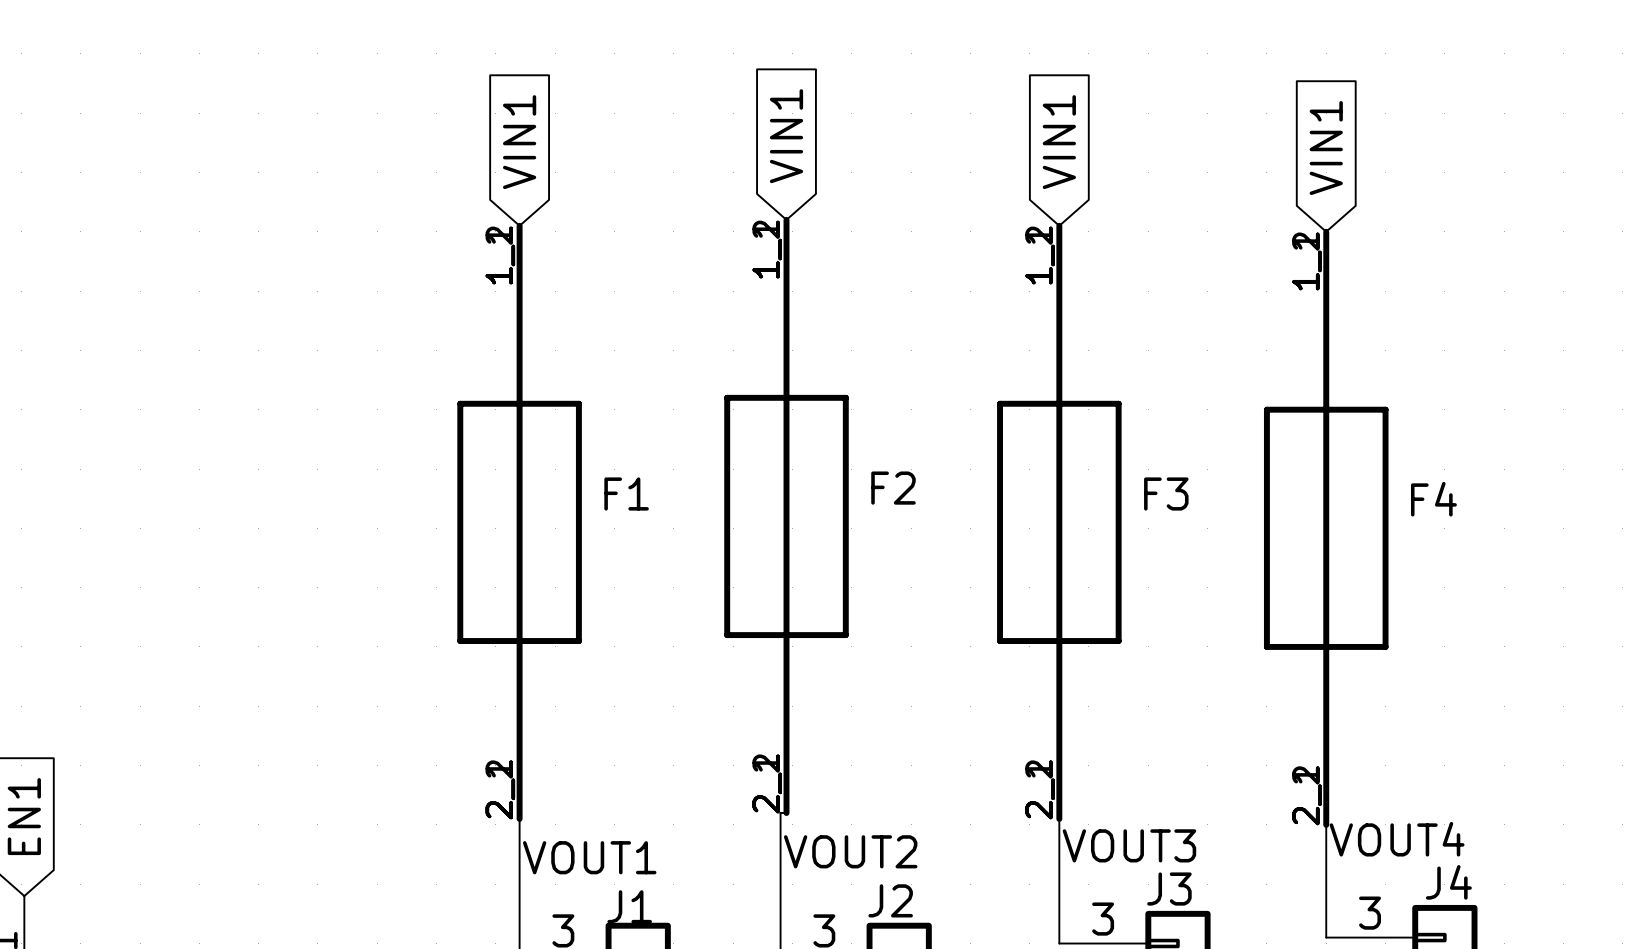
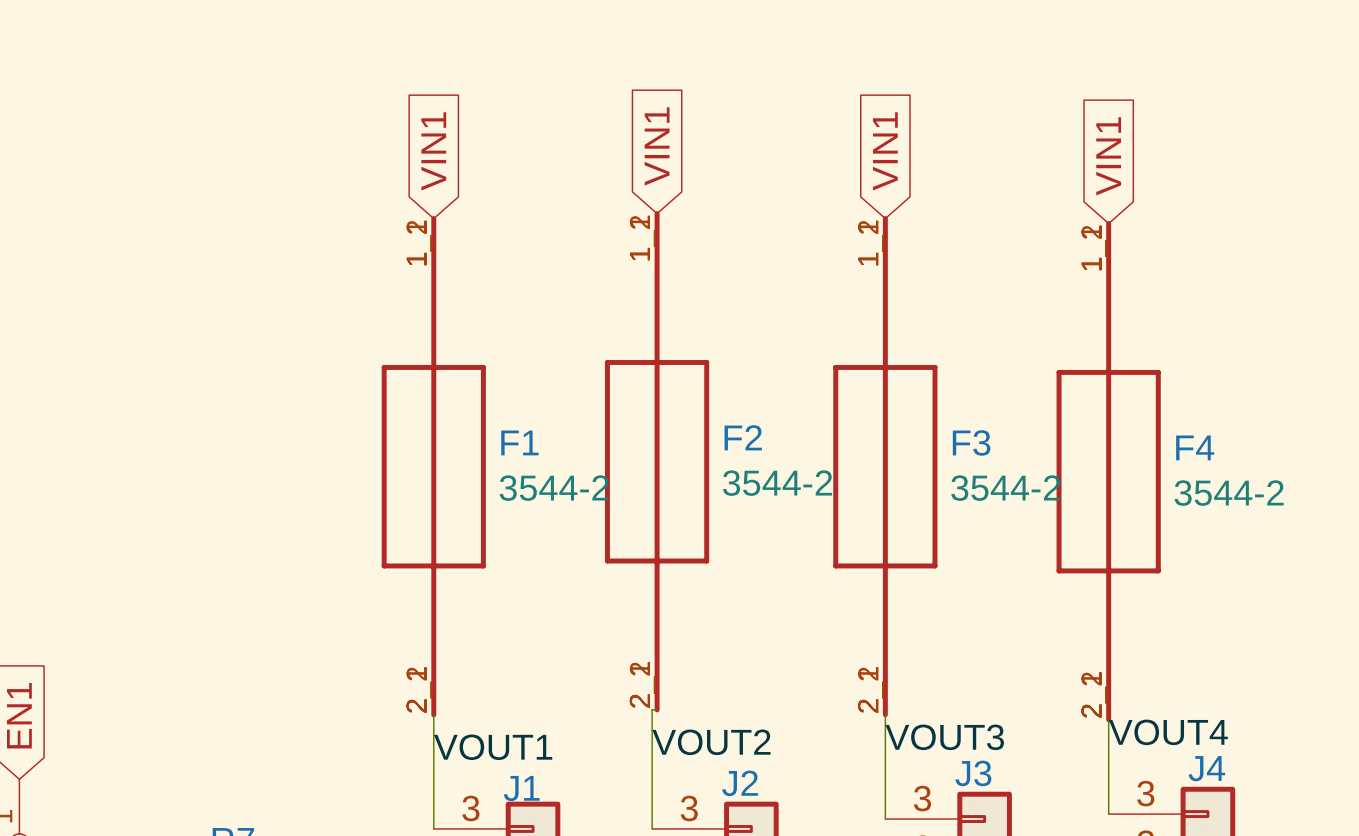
F2 value: none -> 3544-2 (777, 483)
F1 value: none -> 3544-2 (554, 488)
F3 value: none -> 3544-2 (1005, 488)
F4 value: none -> 3544-2 (1229, 493)

